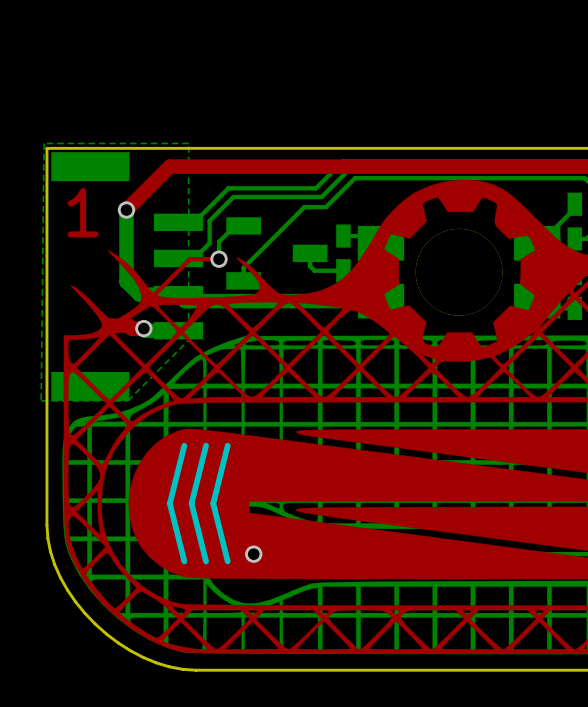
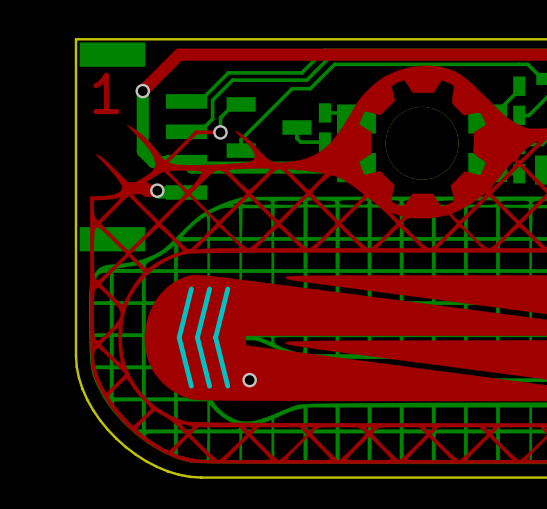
bottom zone outline: (44, 143) (188, 143) (188, 340) (127, 400) (41, 400) (44, 143) -> none

